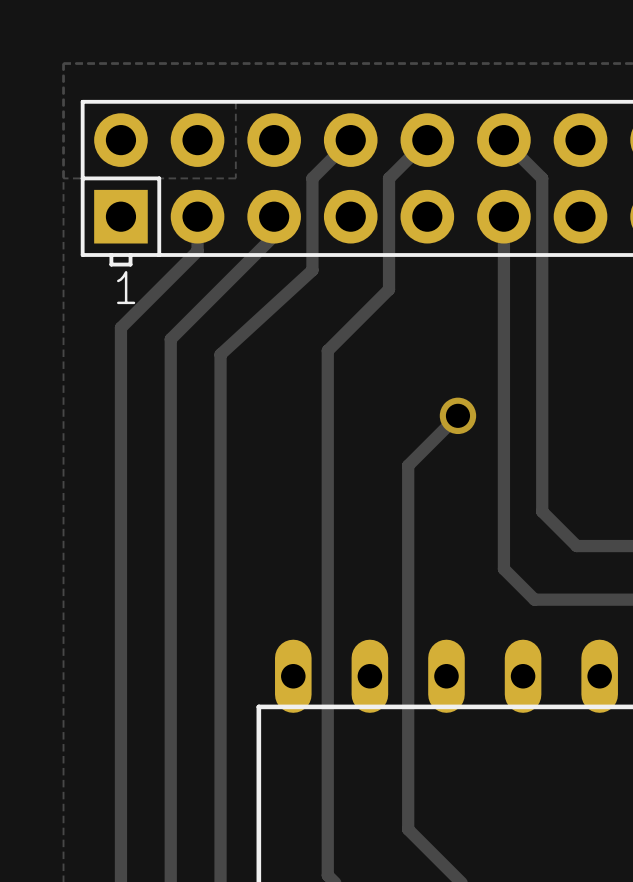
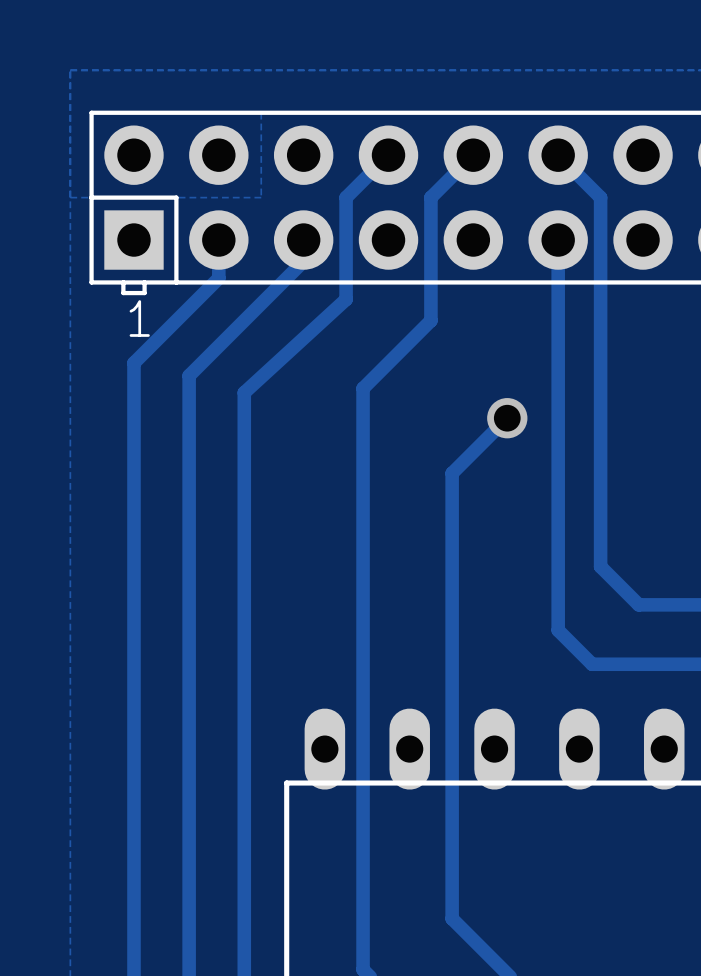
track: (457, 415) (408, 465) -> (507, 418) (452, 473) (452, 515)
via position: (457, 415) -> (507, 418)

